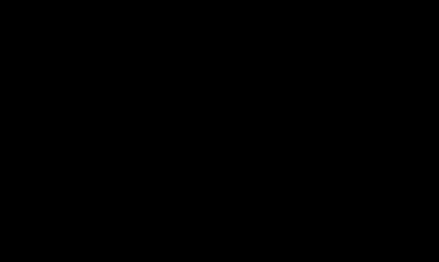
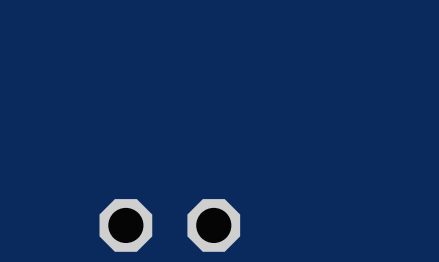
part: none -> (169, 225)

